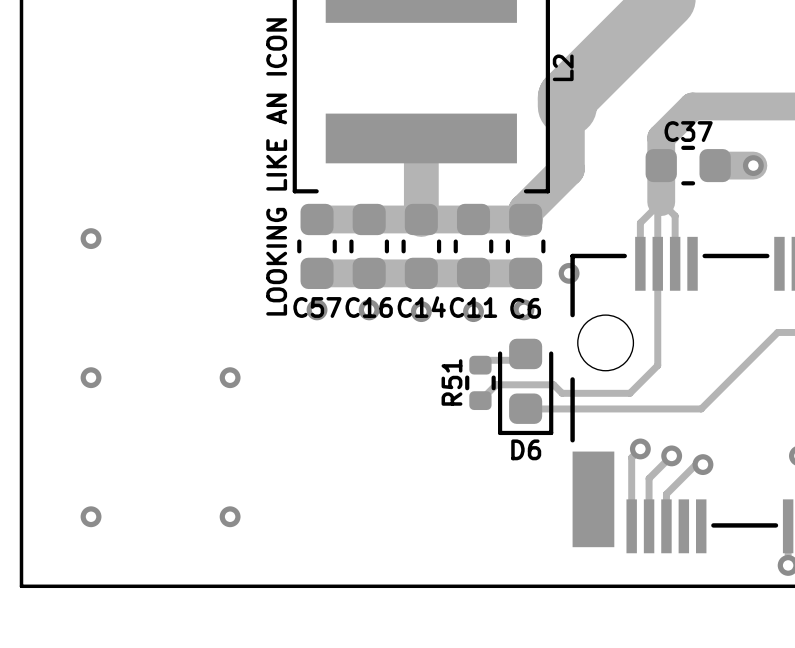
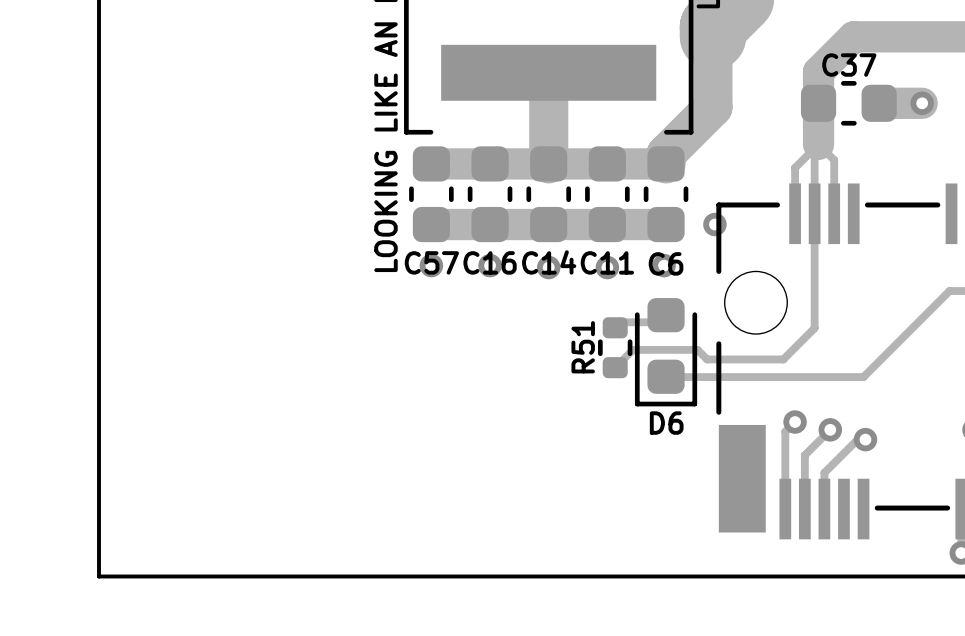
via: (91, 238) -> none
via: (91, 377) -> none
via: (230, 377) -> none
via: (91, 516) -> none
via: (230, 516) -> none

